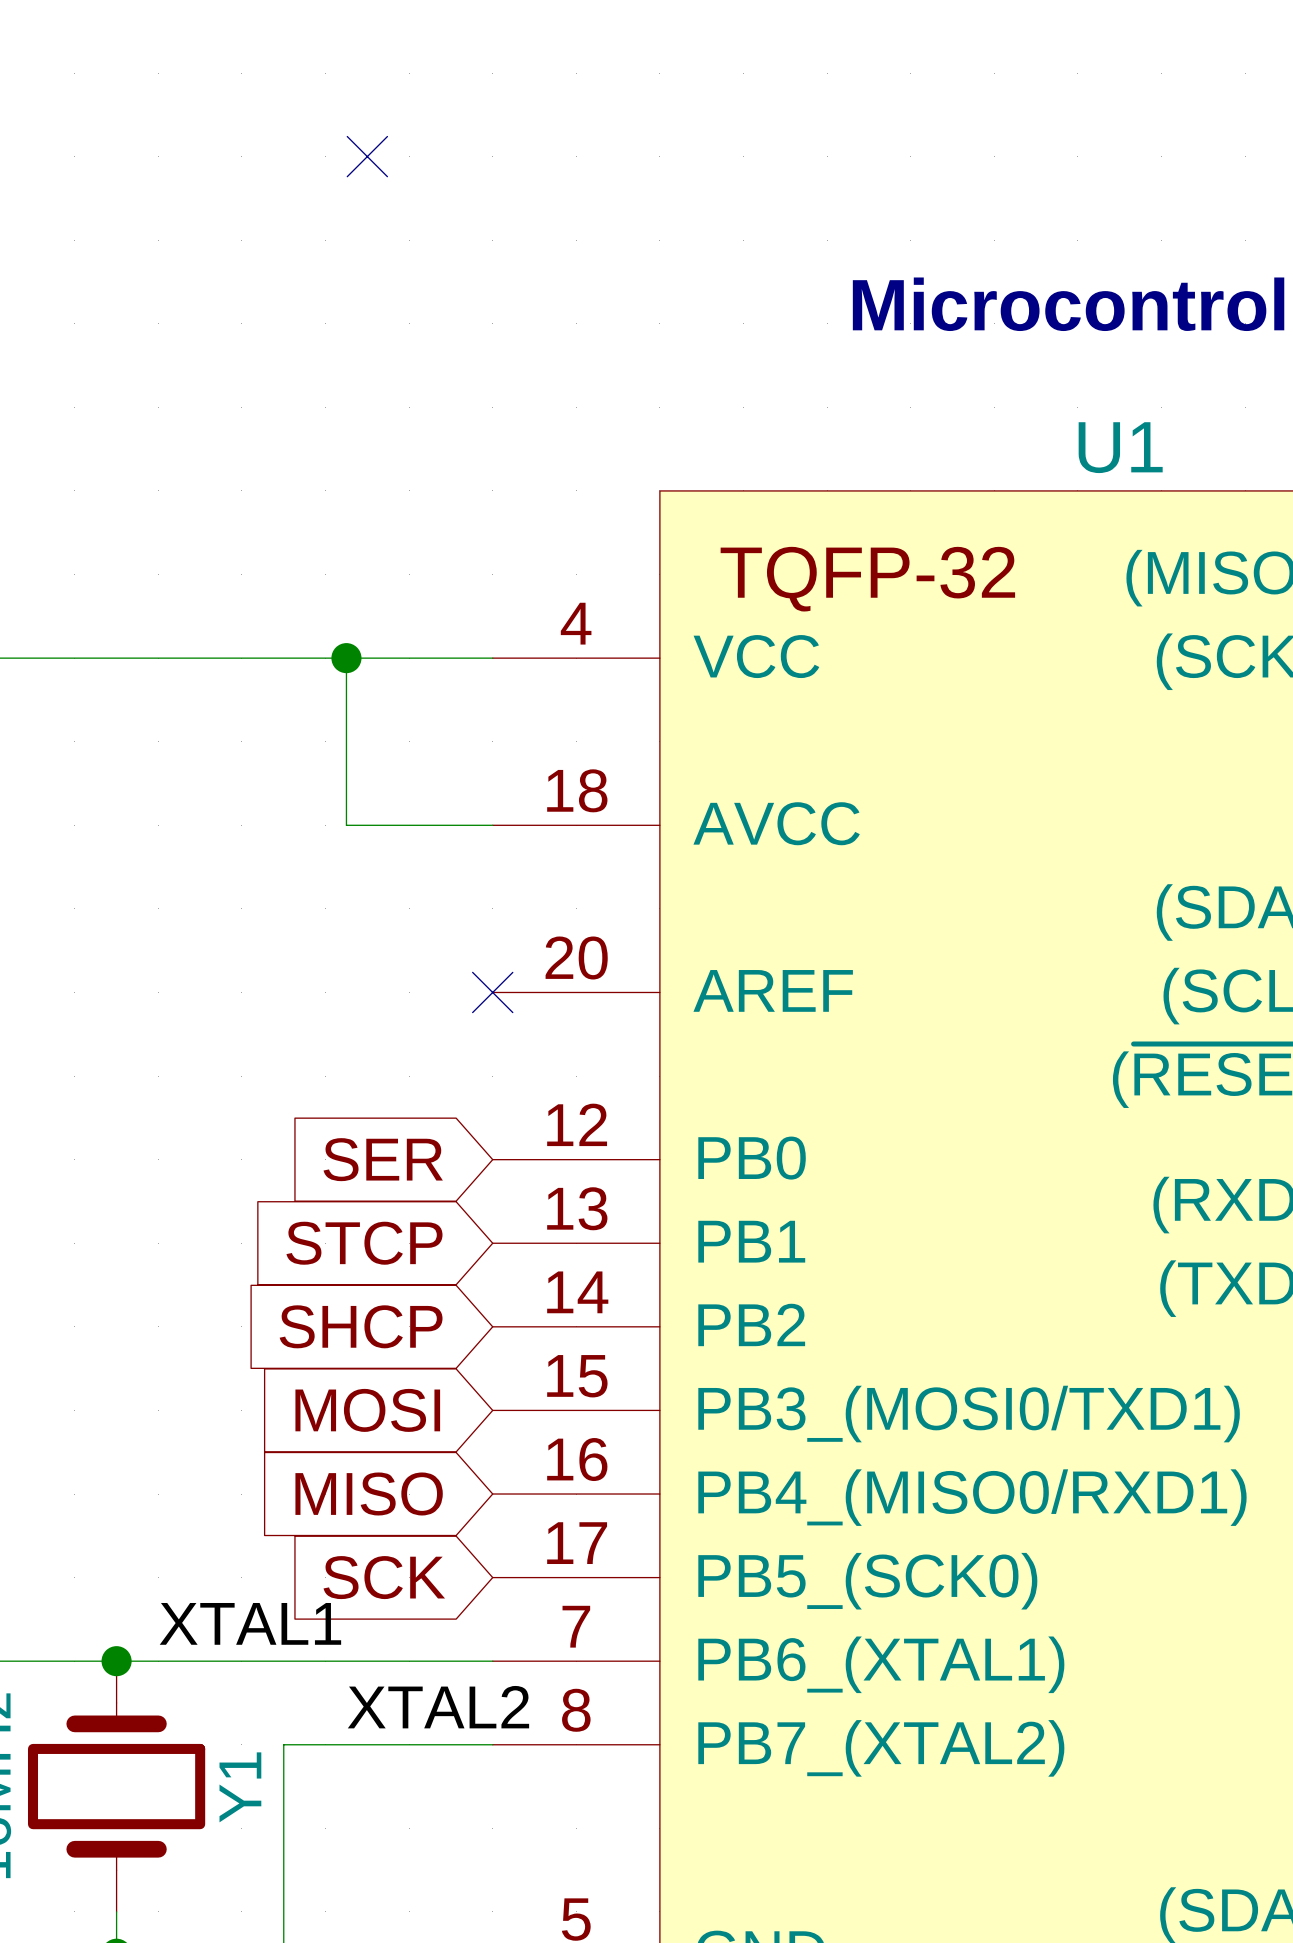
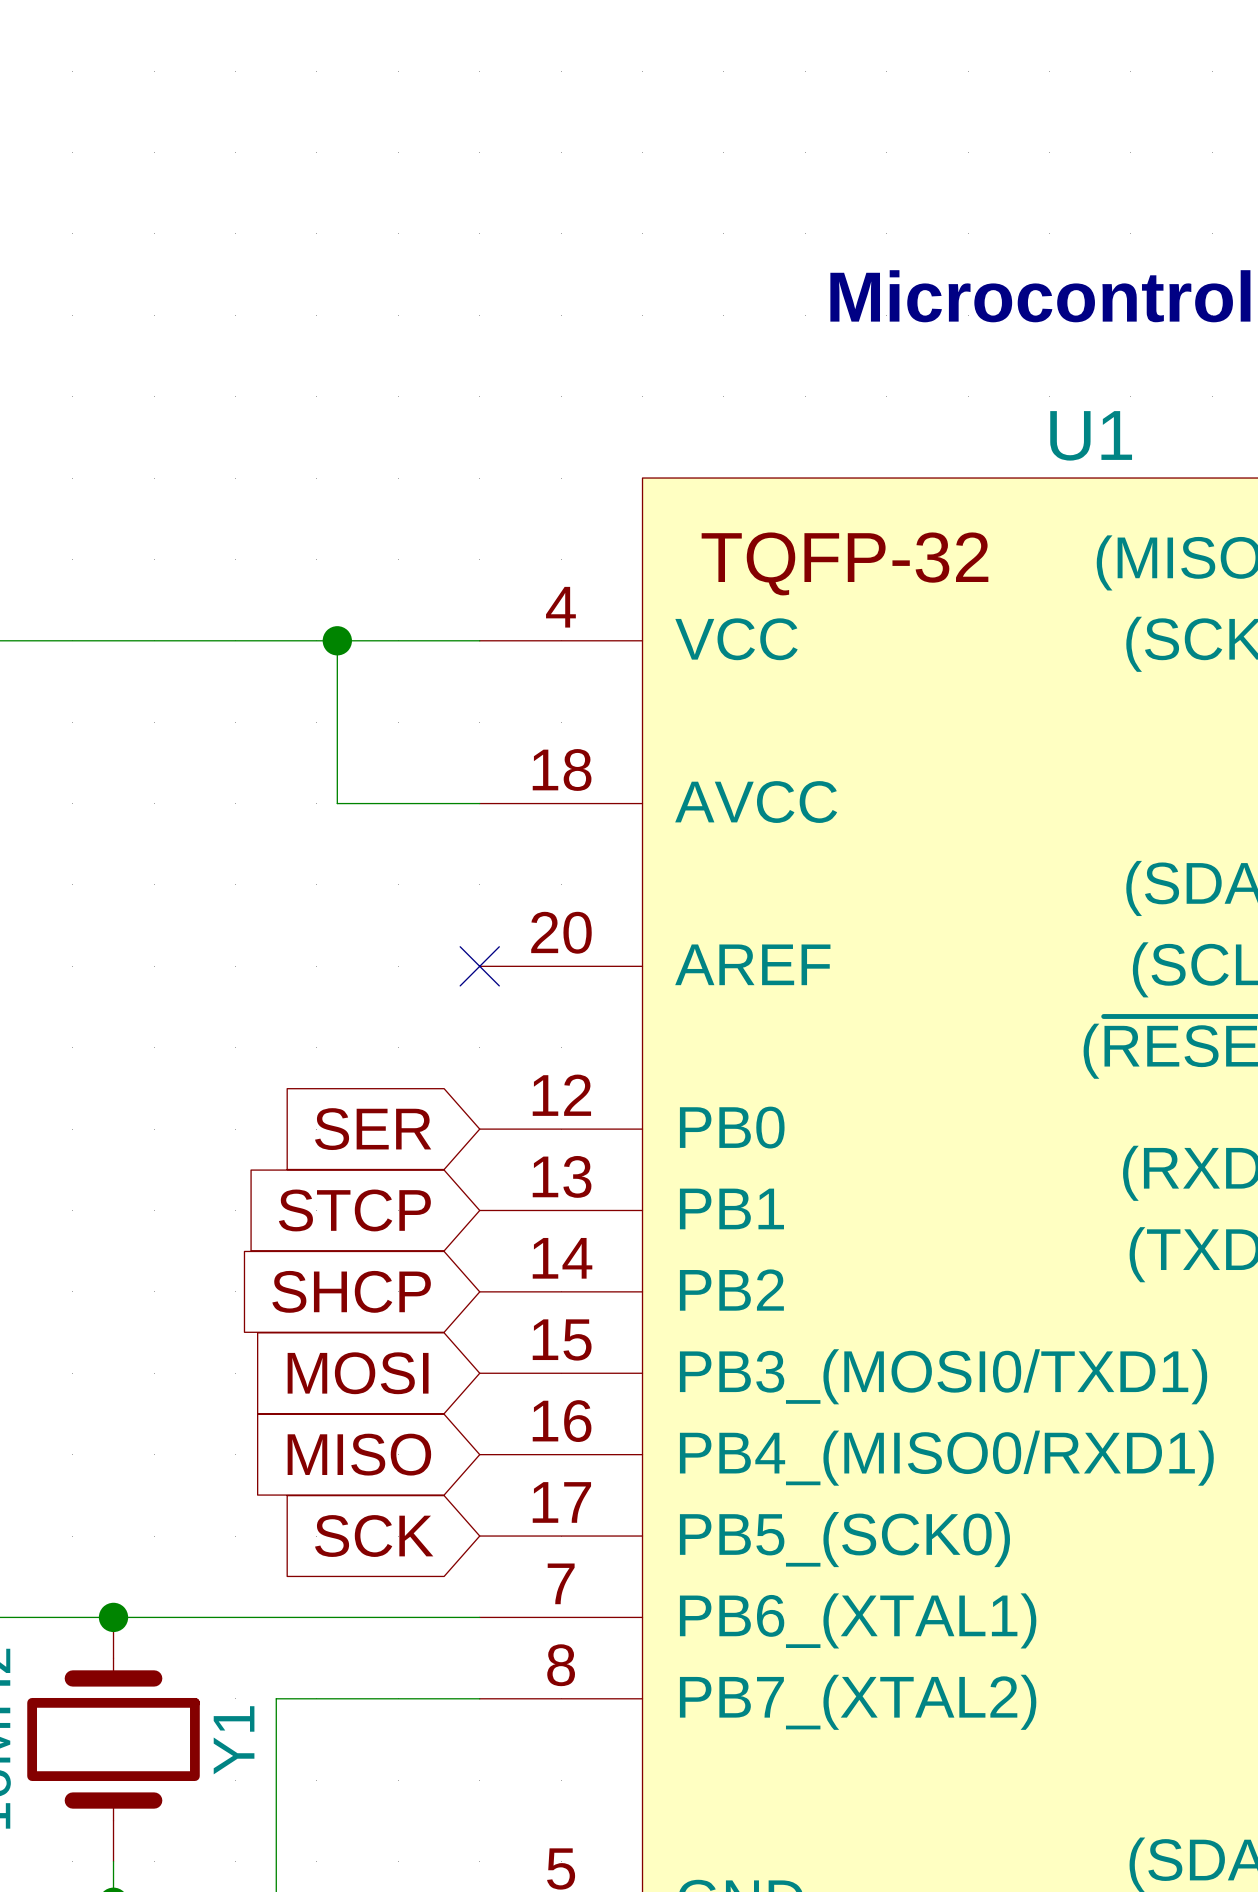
no-connect mark: (367, 156) -> none
label: XTAL1 (250, 1623) -> none
label: XTAL2 (438, 1707) -> none

